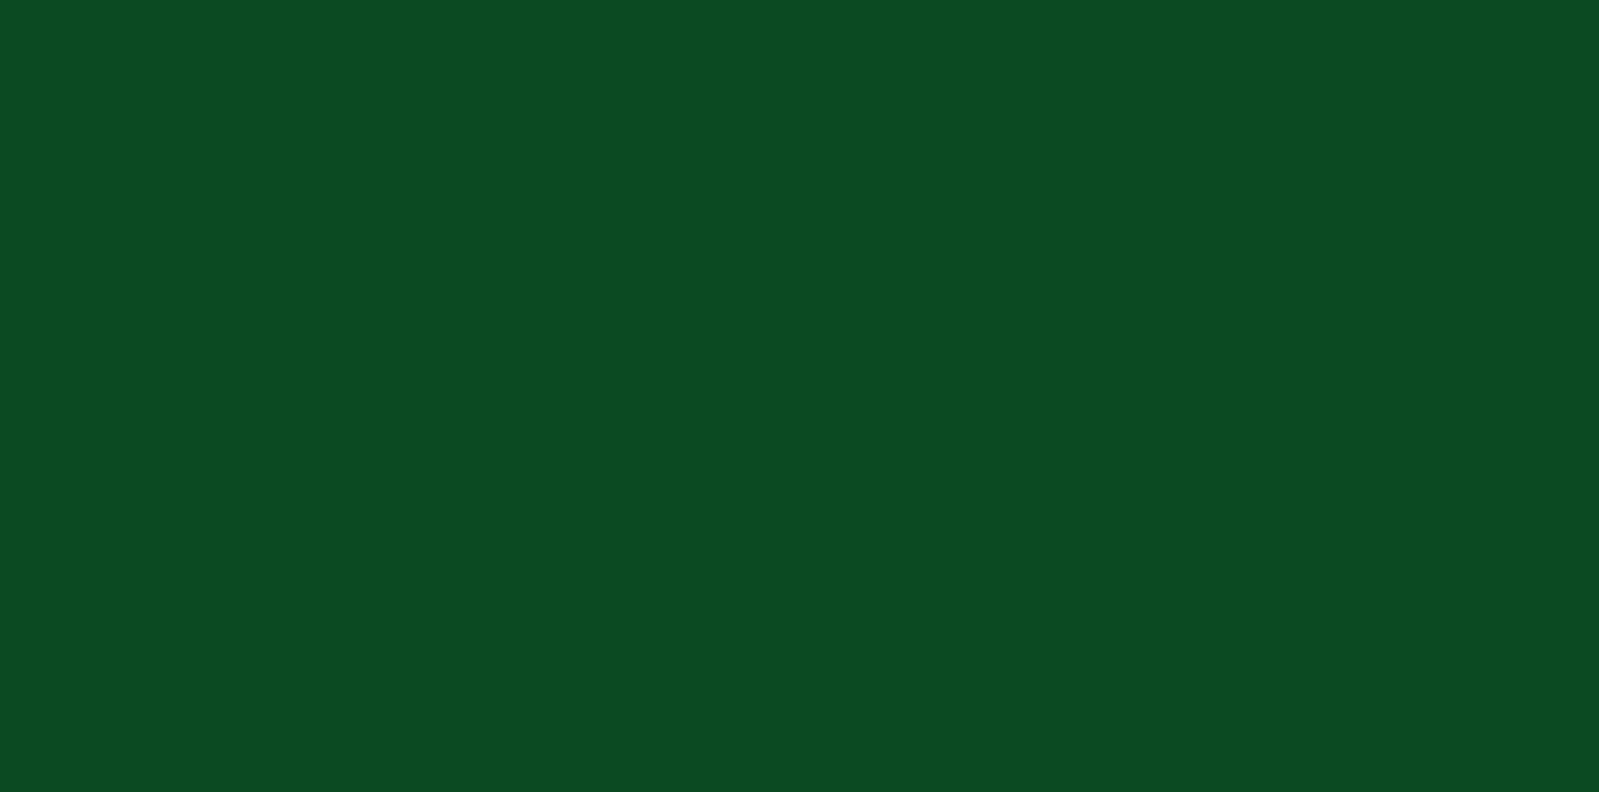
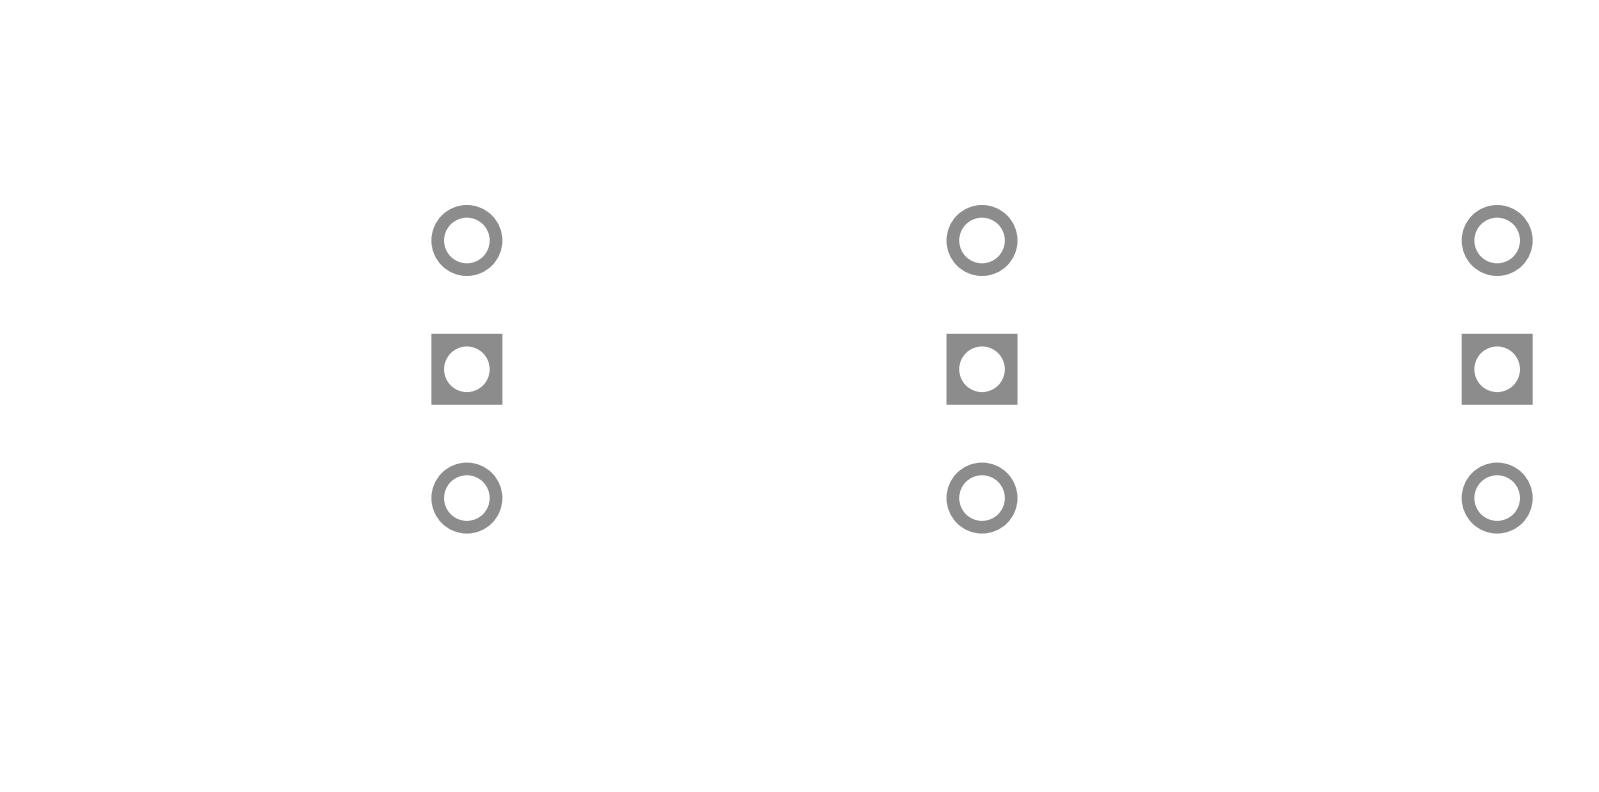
part: none -> (466, 369)
part: none -> (982, 369)
part: none -> (1497, 369)

